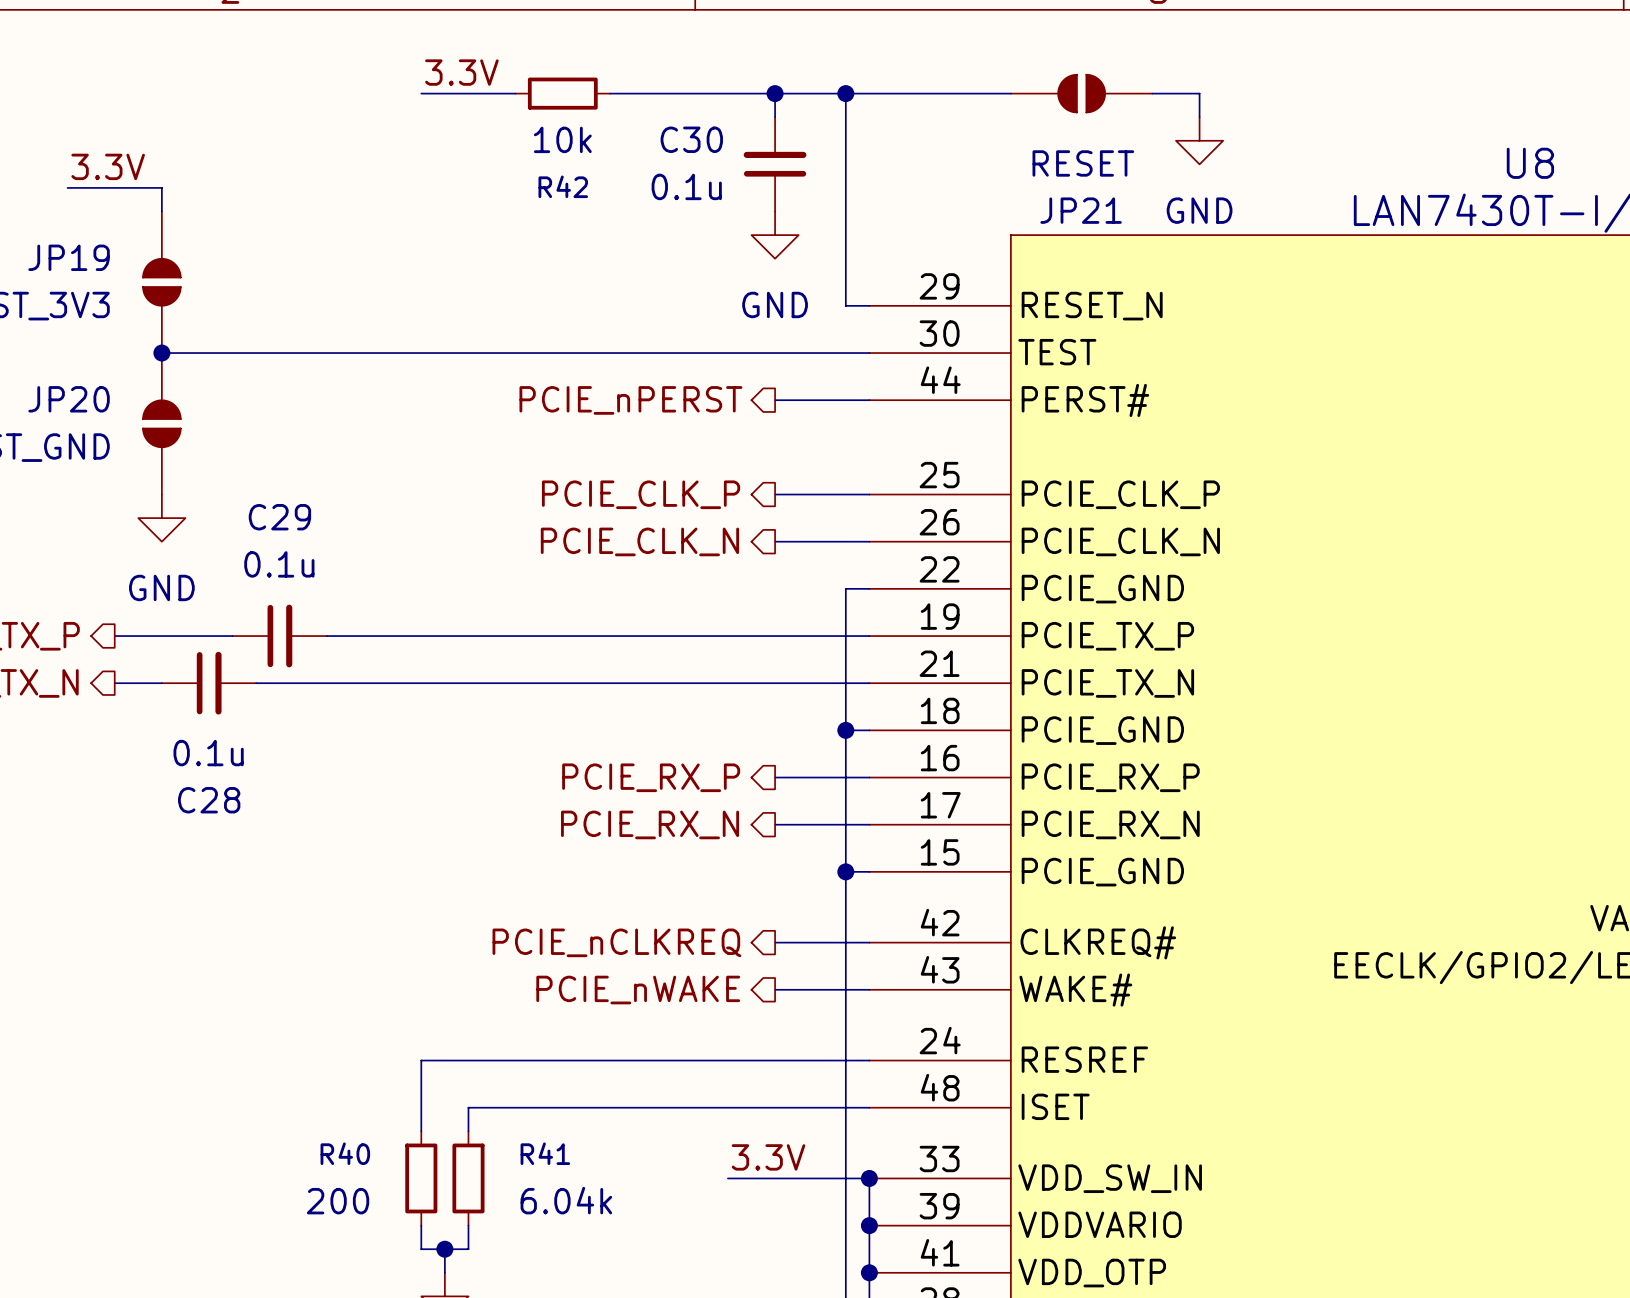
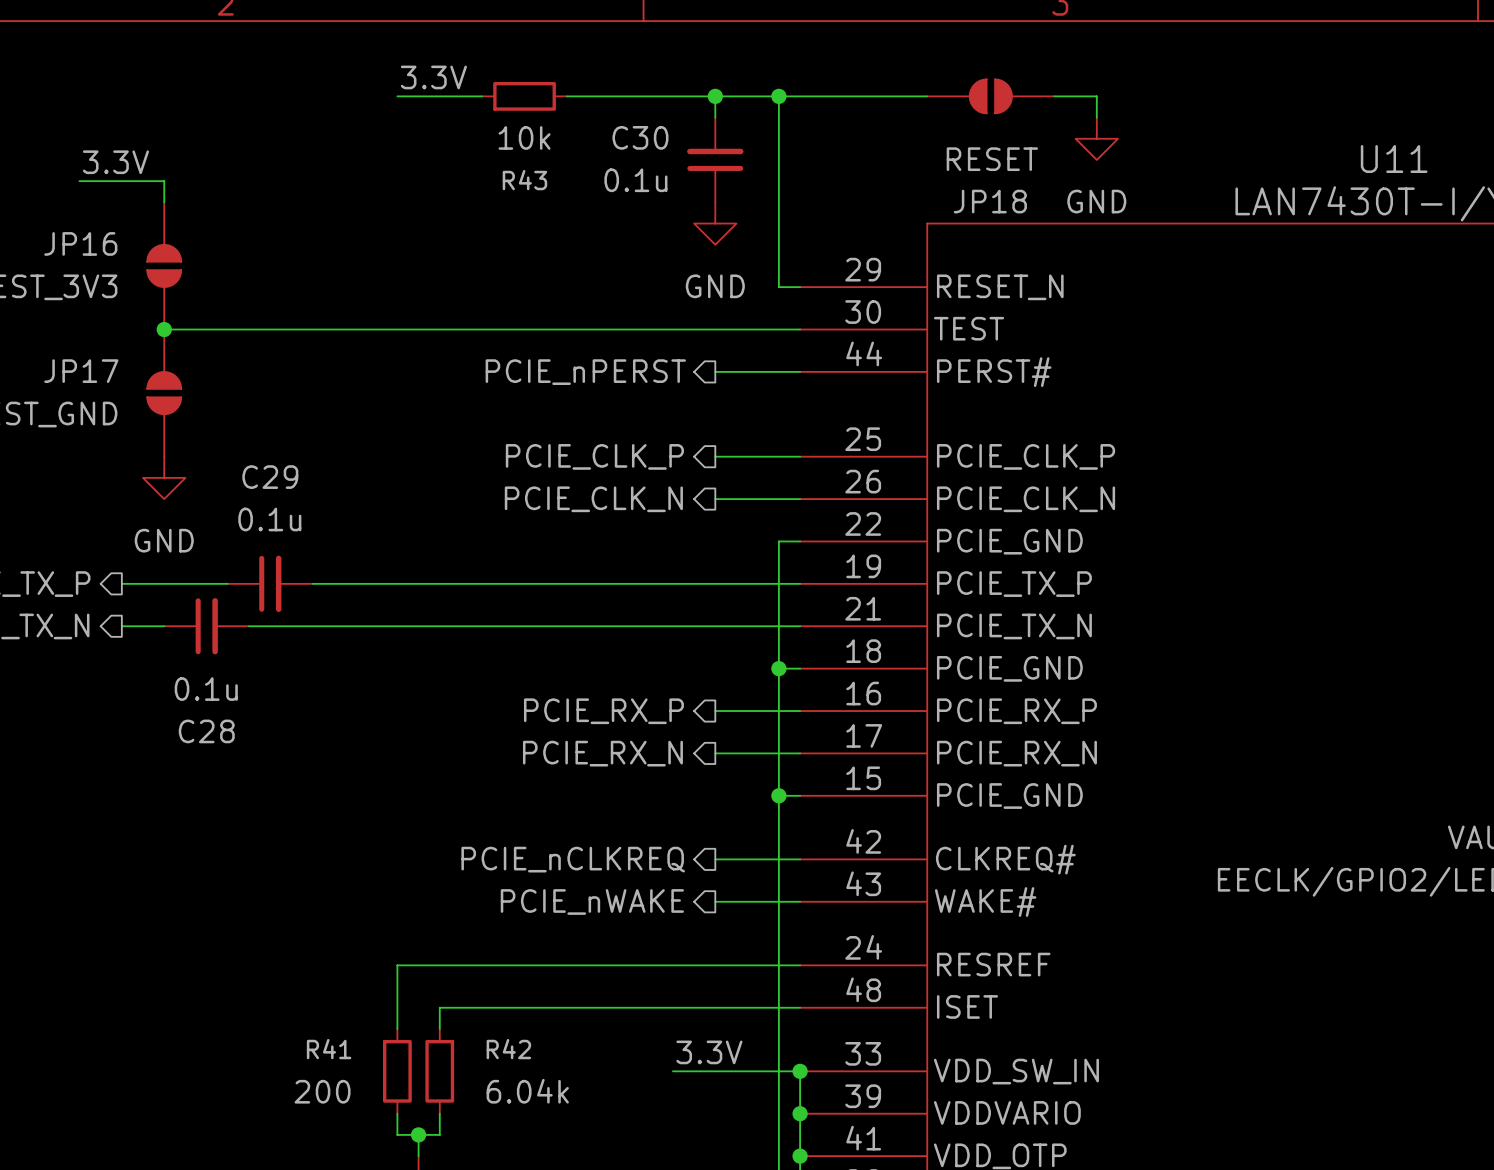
U8 name: U8 (1530, 163) -> U11 (1394, 159)
R42 name: R42 (563, 186) -> R43 (524, 180)
JP21 name: JP21 (1081, 210) -> JP18 (990, 201)
JP19 name: JP19 (69, 257) -> JP16 (80, 243)
JP20 name: JP20 (69, 399) -> JP17 (81, 371)
R40 name: R40 (345, 1153) -> R41 (329, 1049)
R41 name: R41 (545, 1153) -> R42 (508, 1049)

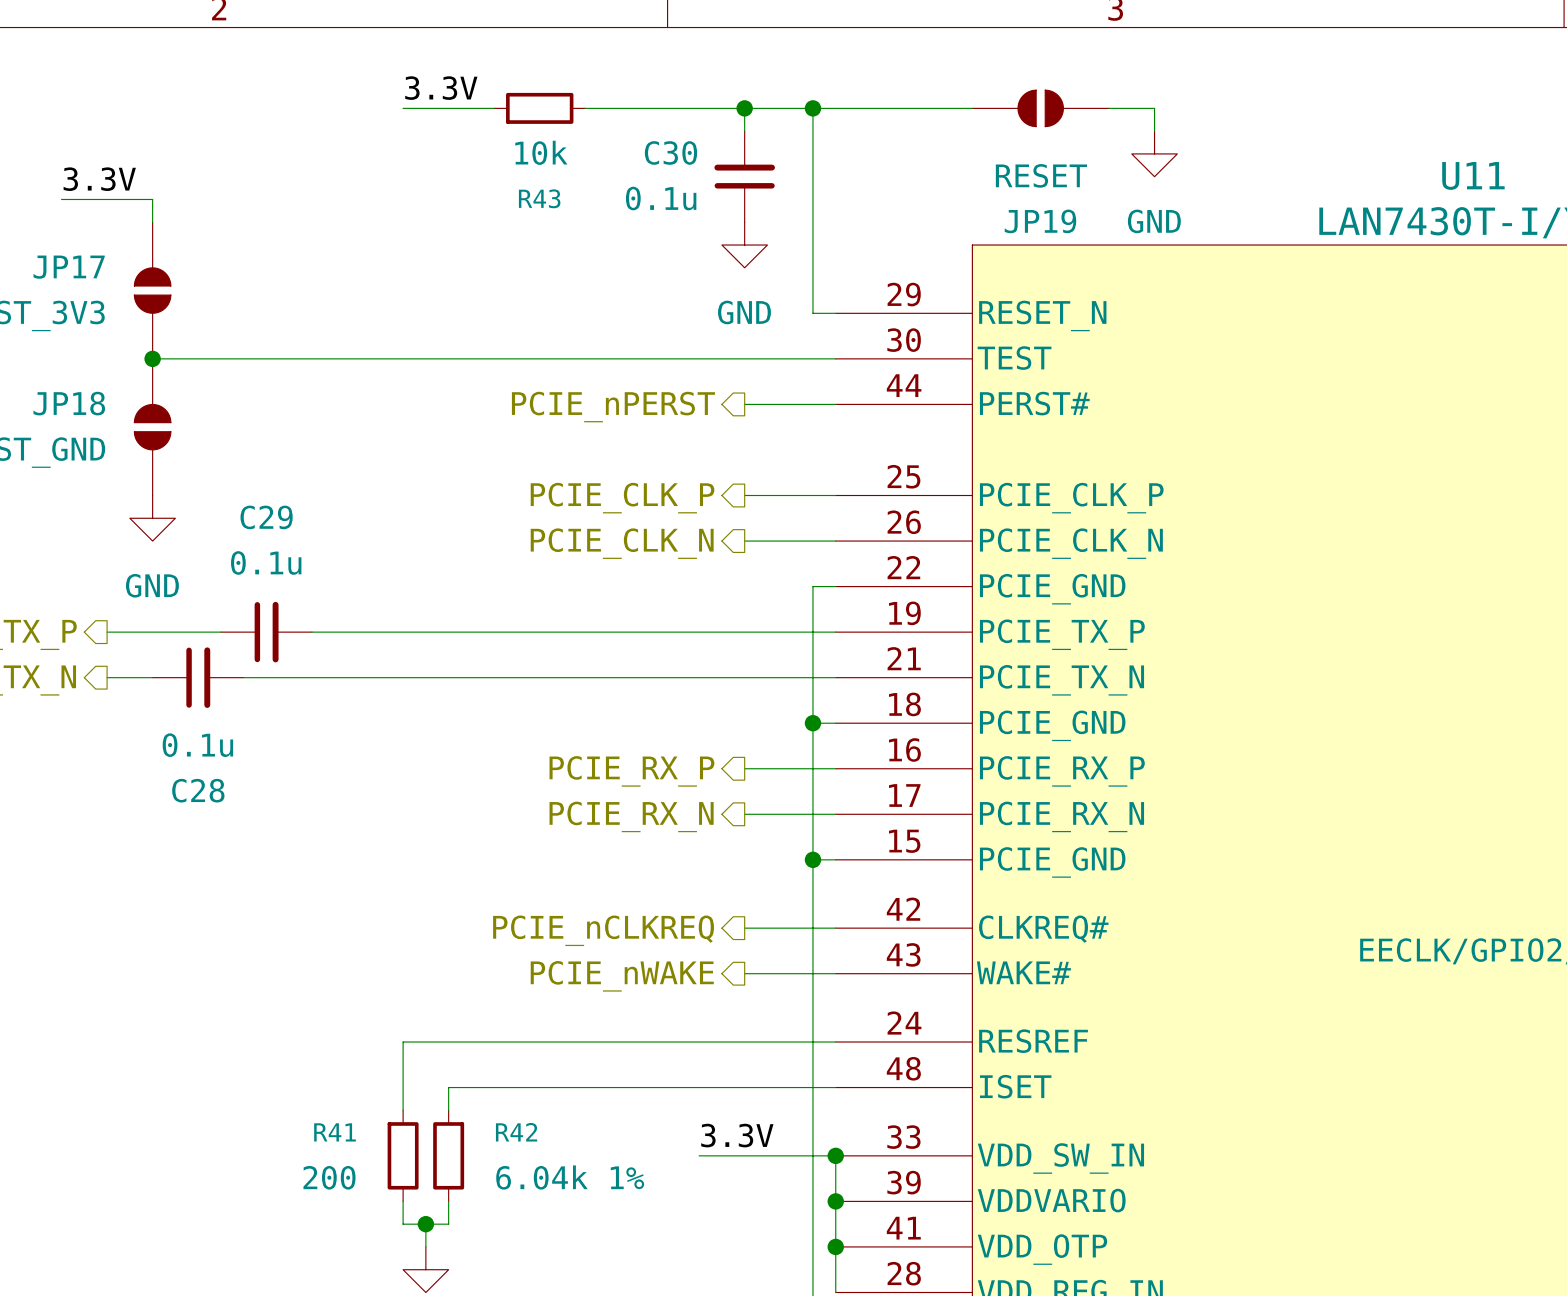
JP18 name: JP18 (990, 201) -> JP19 (1040, 221)
JP16 name: JP16 (80, 243) -> JP17 (69, 267)
JP17 name: JP17 (81, 371) -> JP18 (69, 403)
R42 value: 6.04k (527, 1091) -> 6.04k 1% (570, 1177)

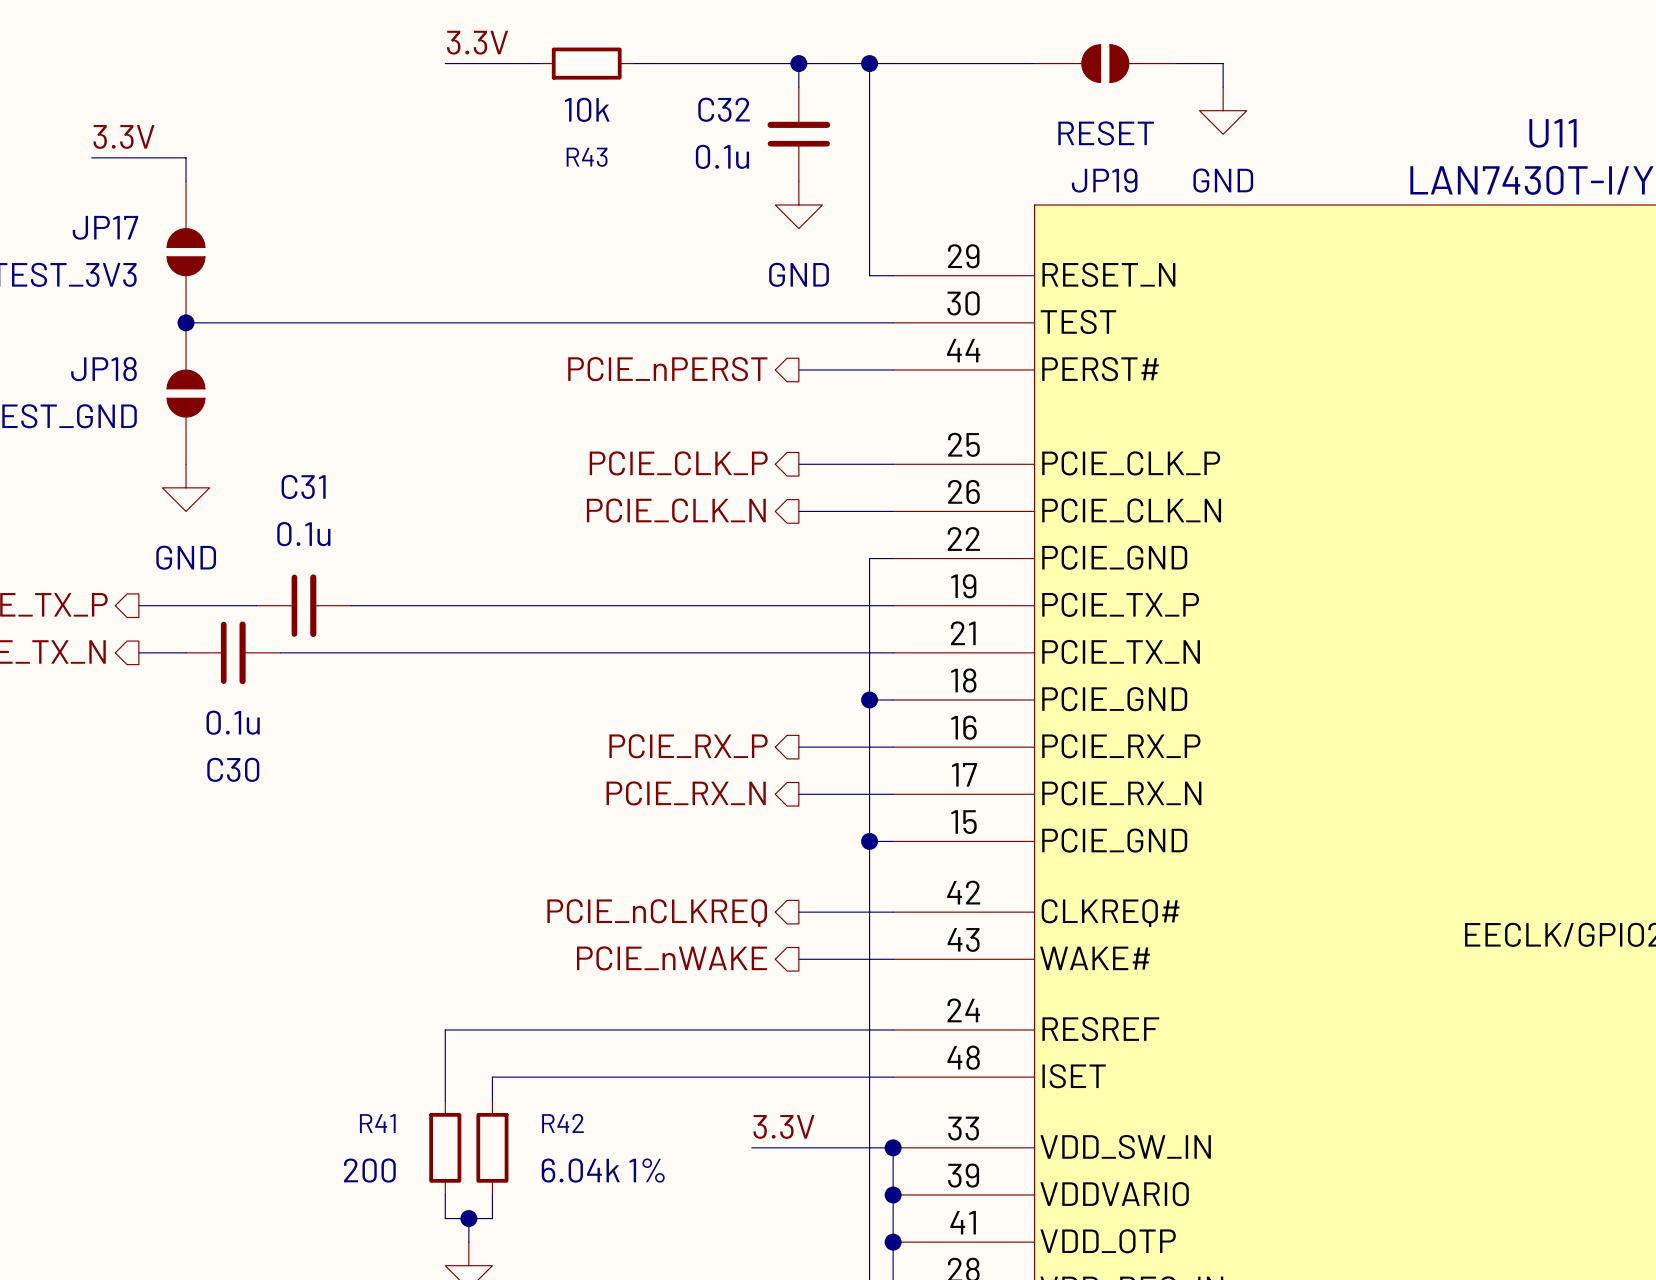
C30 name: C30 (670, 152) -> C32 (724, 109)
C29 name: C29 (266, 517) -> C31 (303, 486)
C28 name: C28 (198, 790) -> C30 (233, 769)

